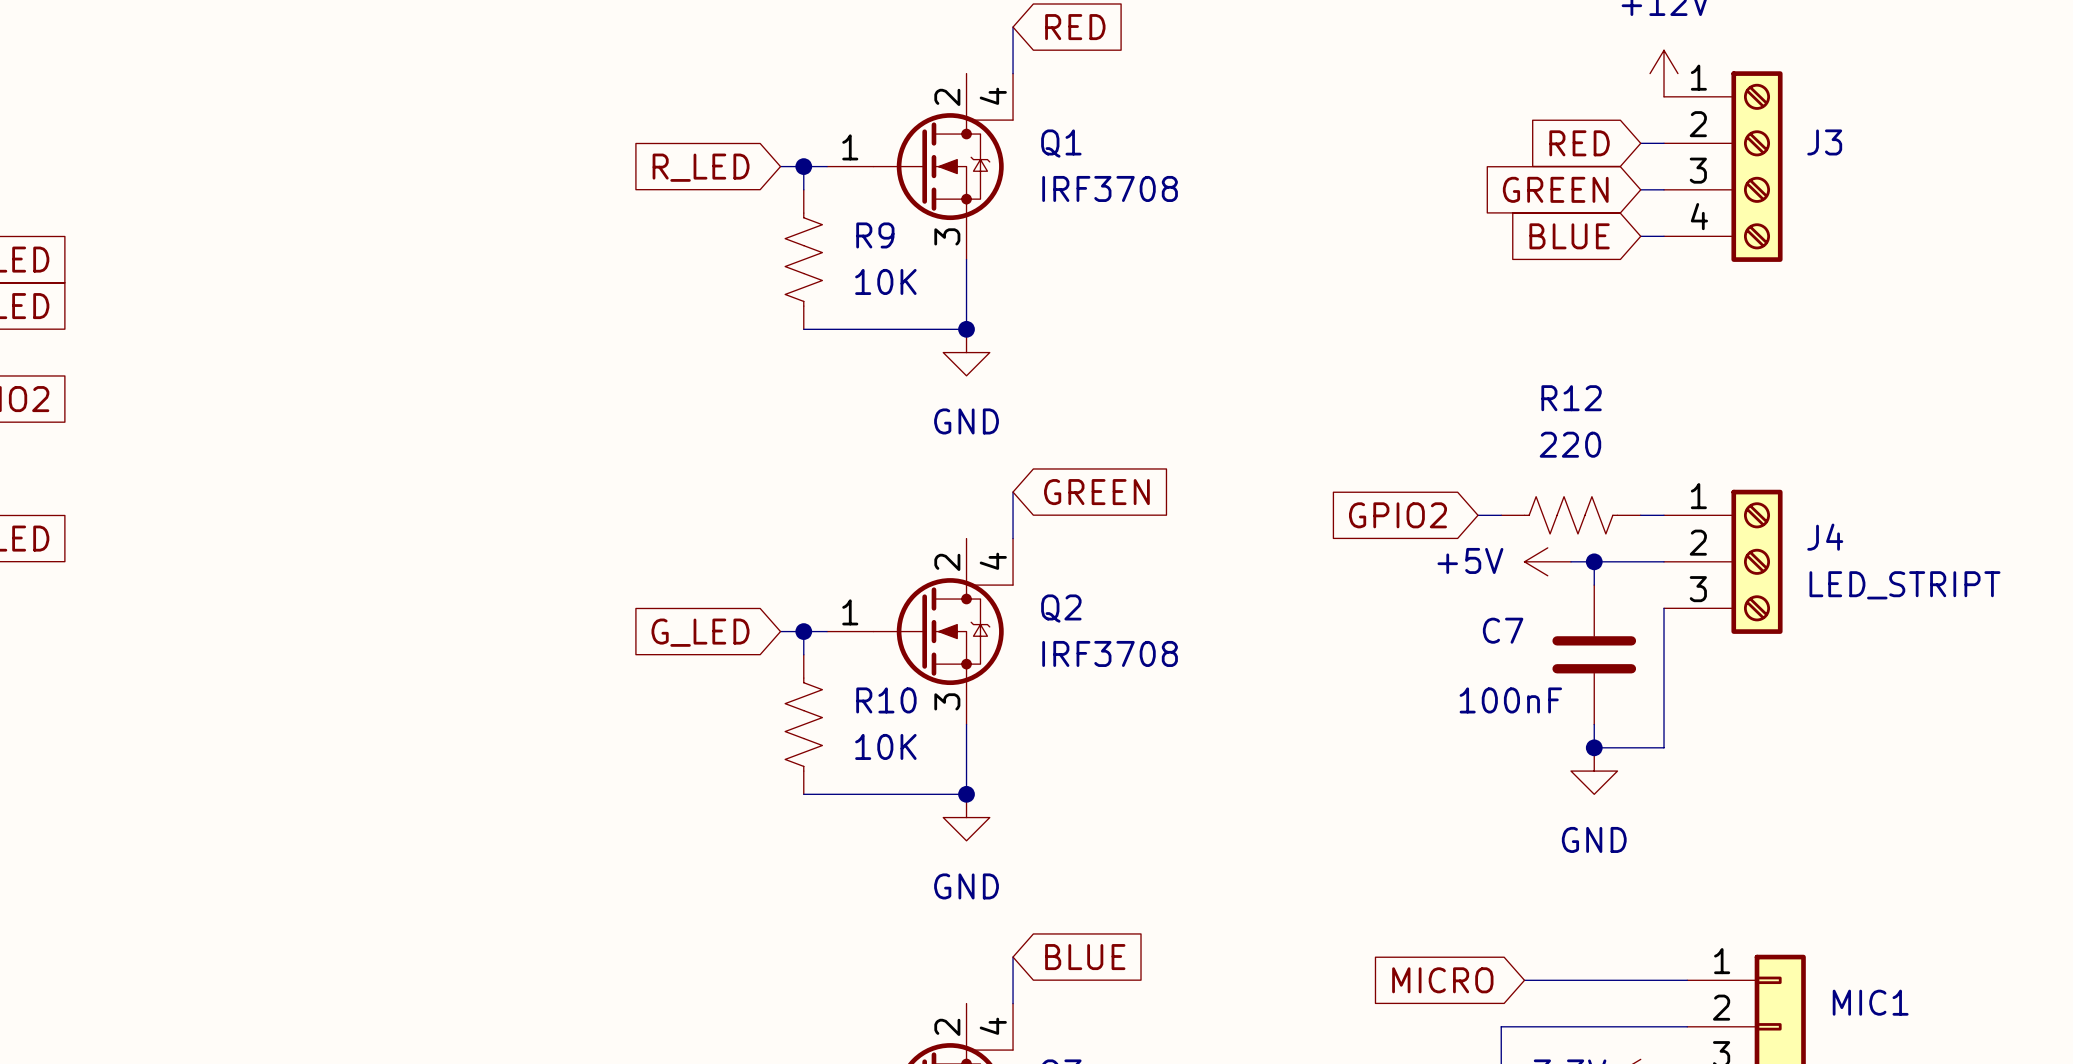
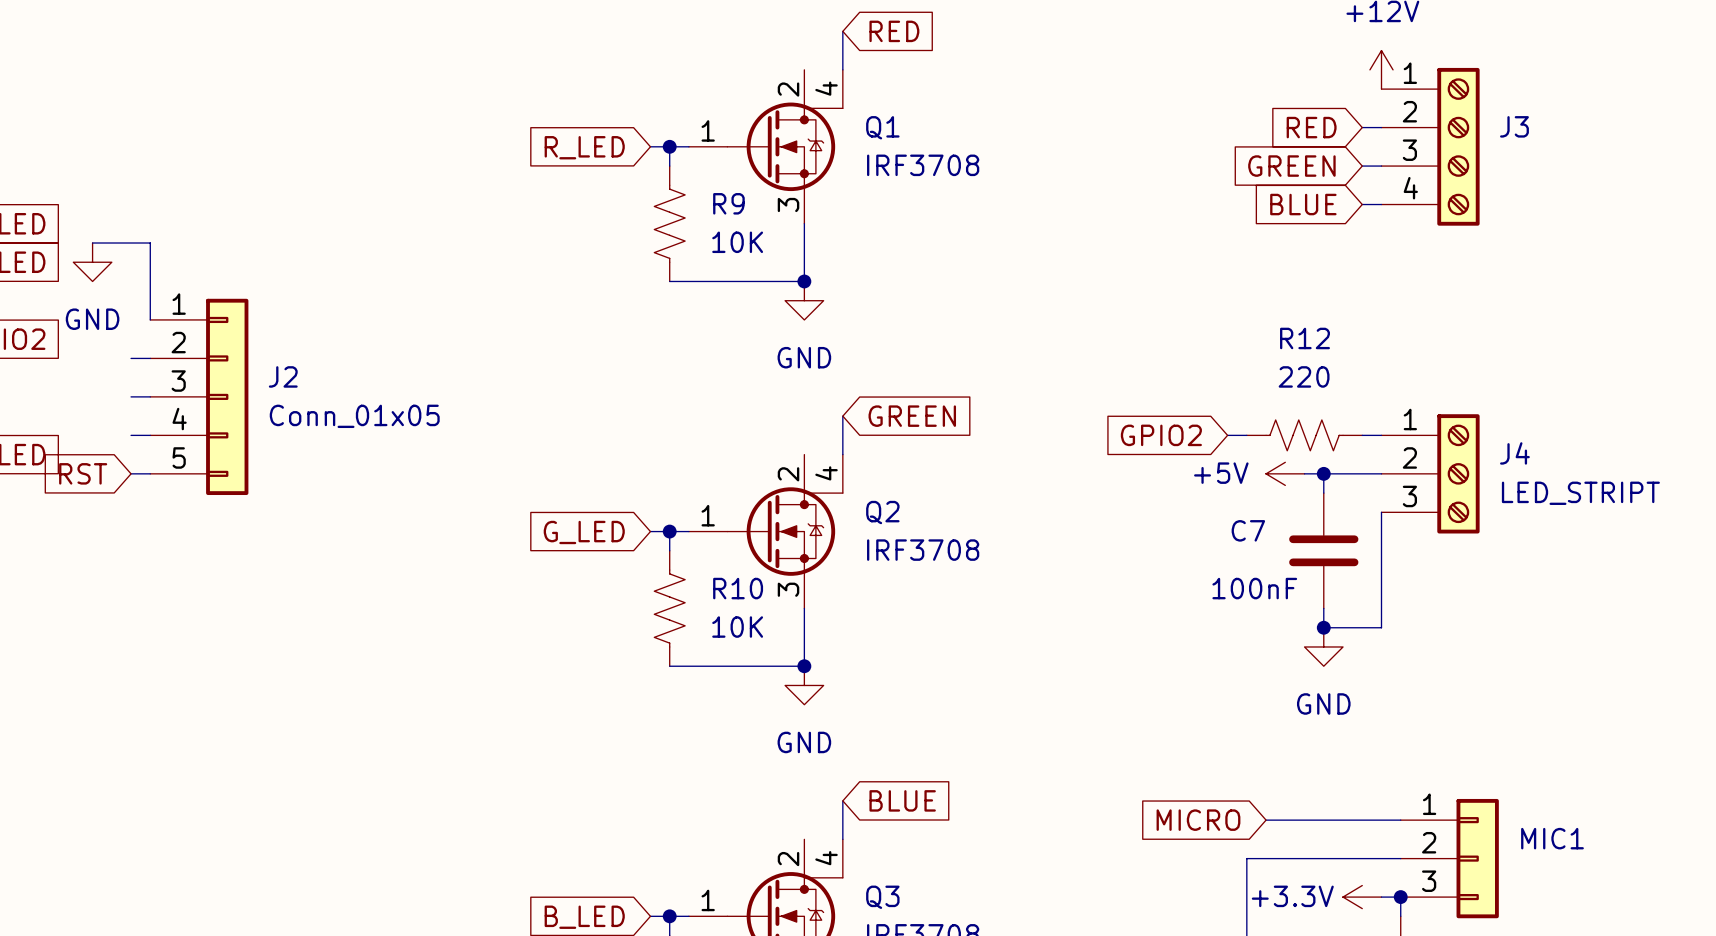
wire: none -> (92, 243) (150, 243) (150, 319)
power symbol: none -> GND (92, 262)
wire: none -> (131, 358) (150, 358)
wire: none -> (131, 396) (150, 396)
J2: none -> Conn_01x05 (199, 396)
wire: none -> (131, 435) (150, 435)
global label: none -> RST (83, 473)
wire: none -> (131, 473) (150, 473)

